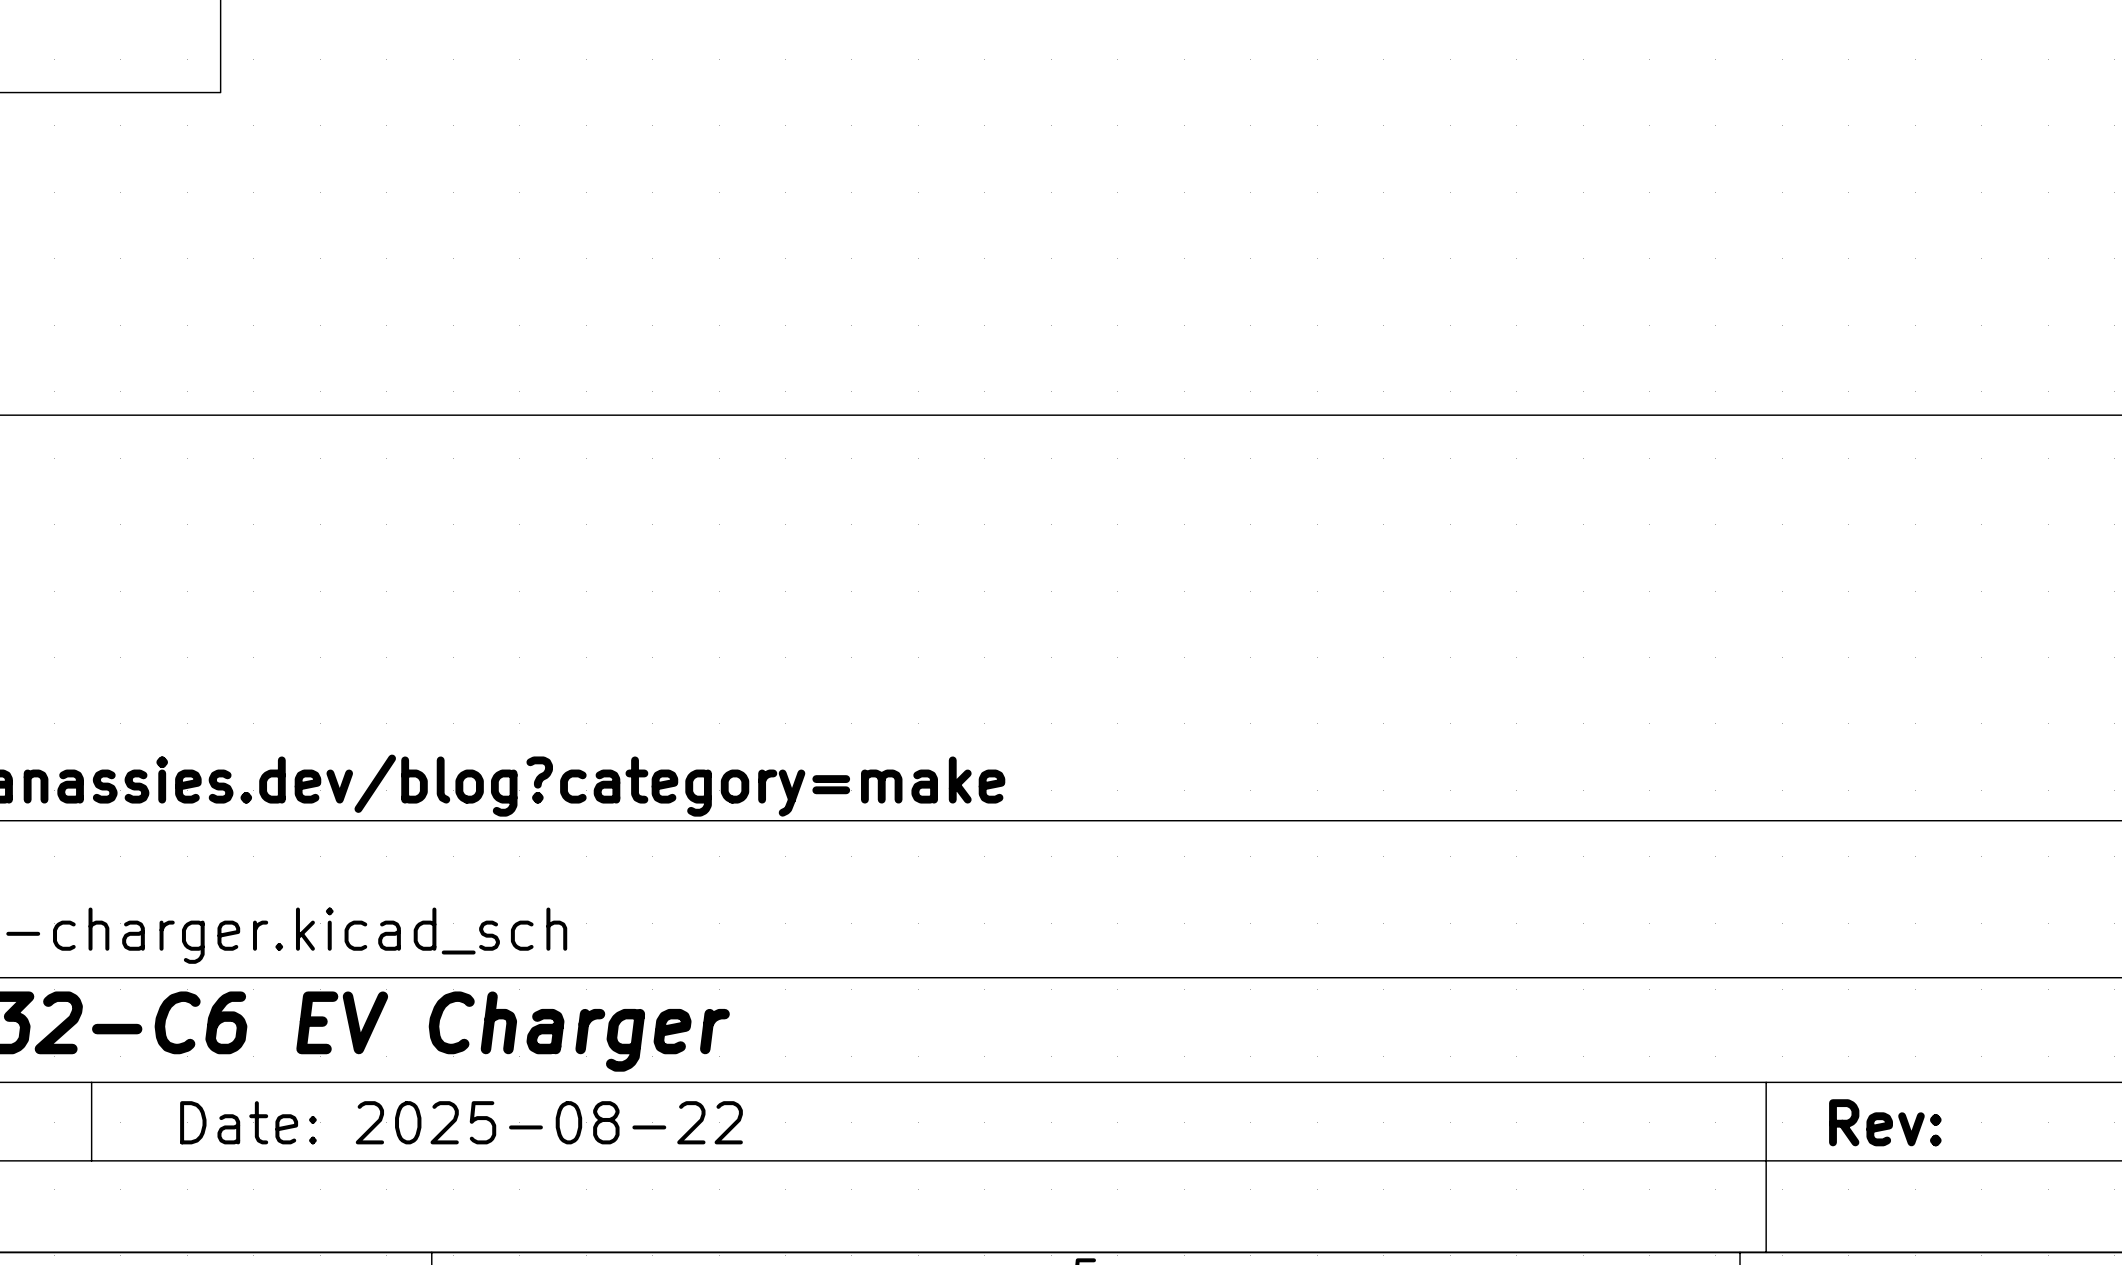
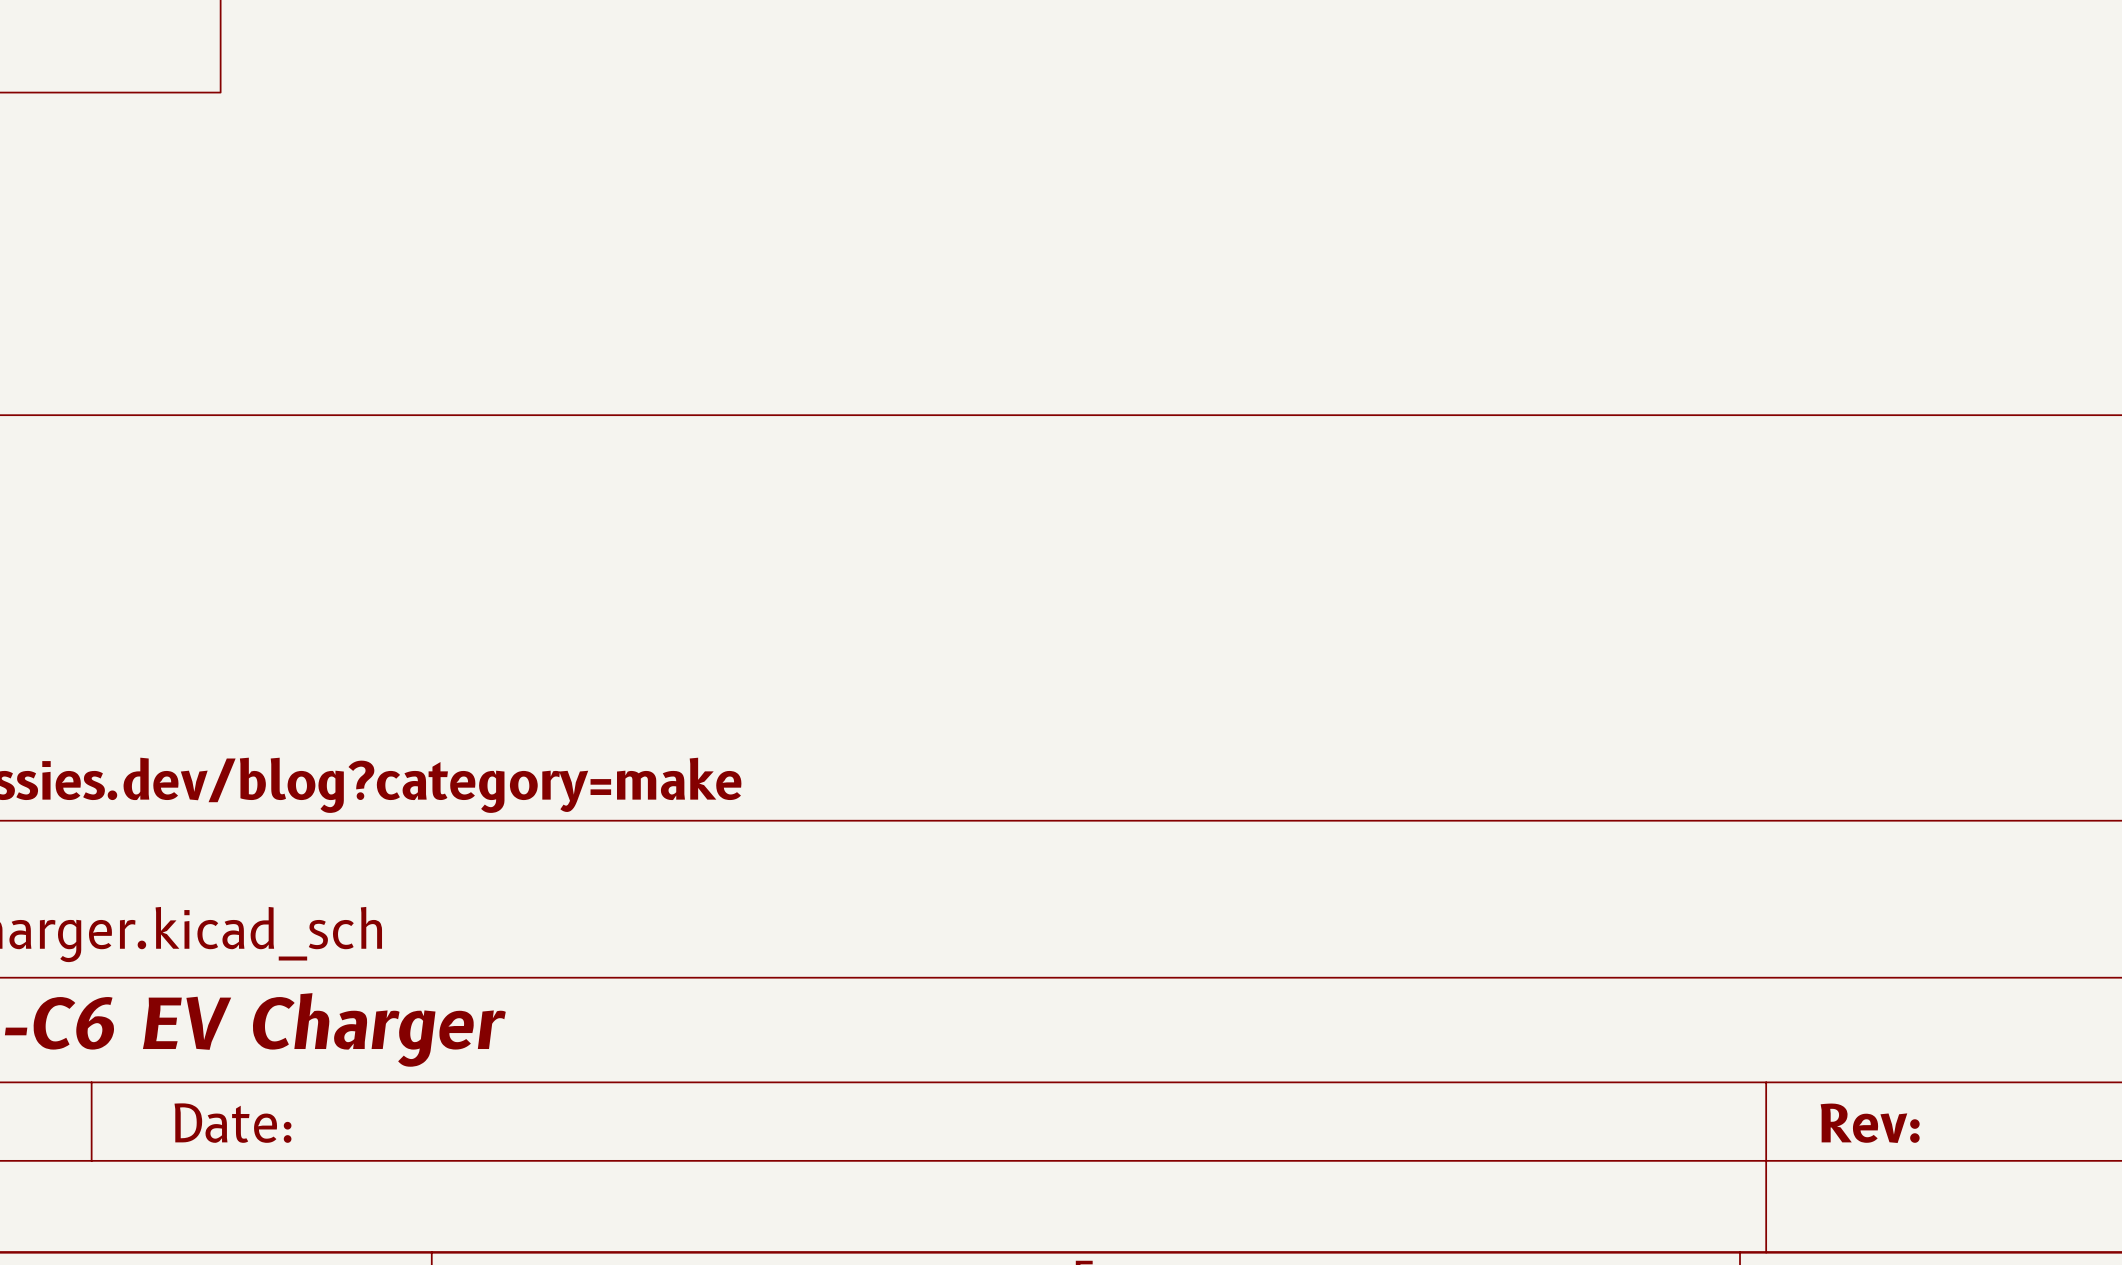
title block: Date: 2025-08-22 (461, 1122) -> Date: (232, 1123)

